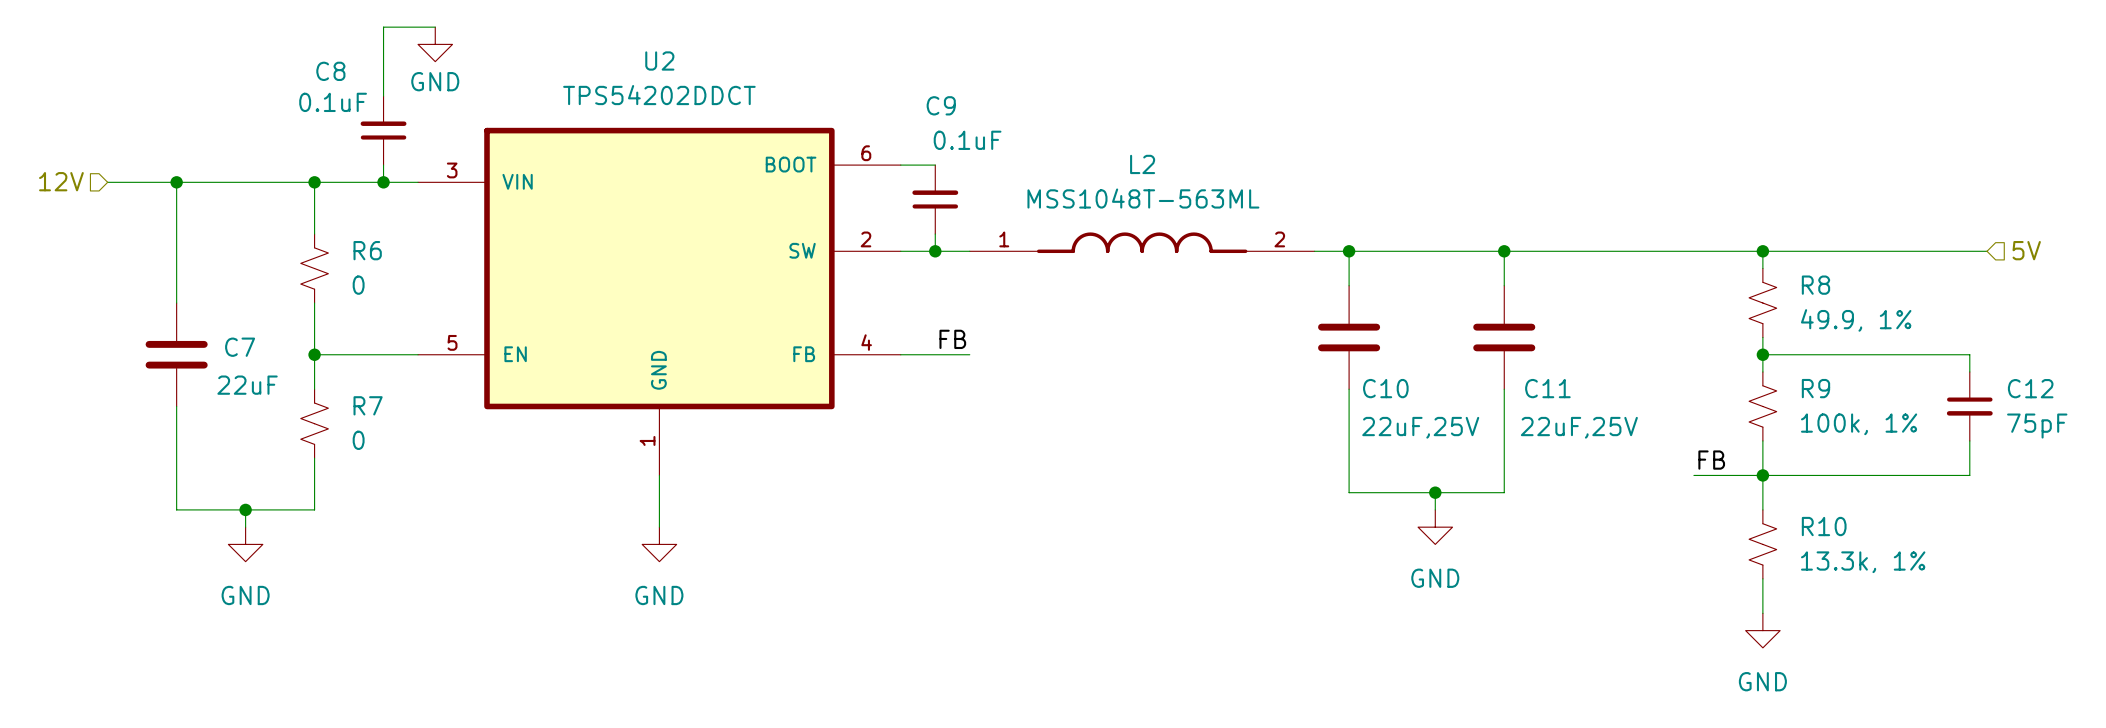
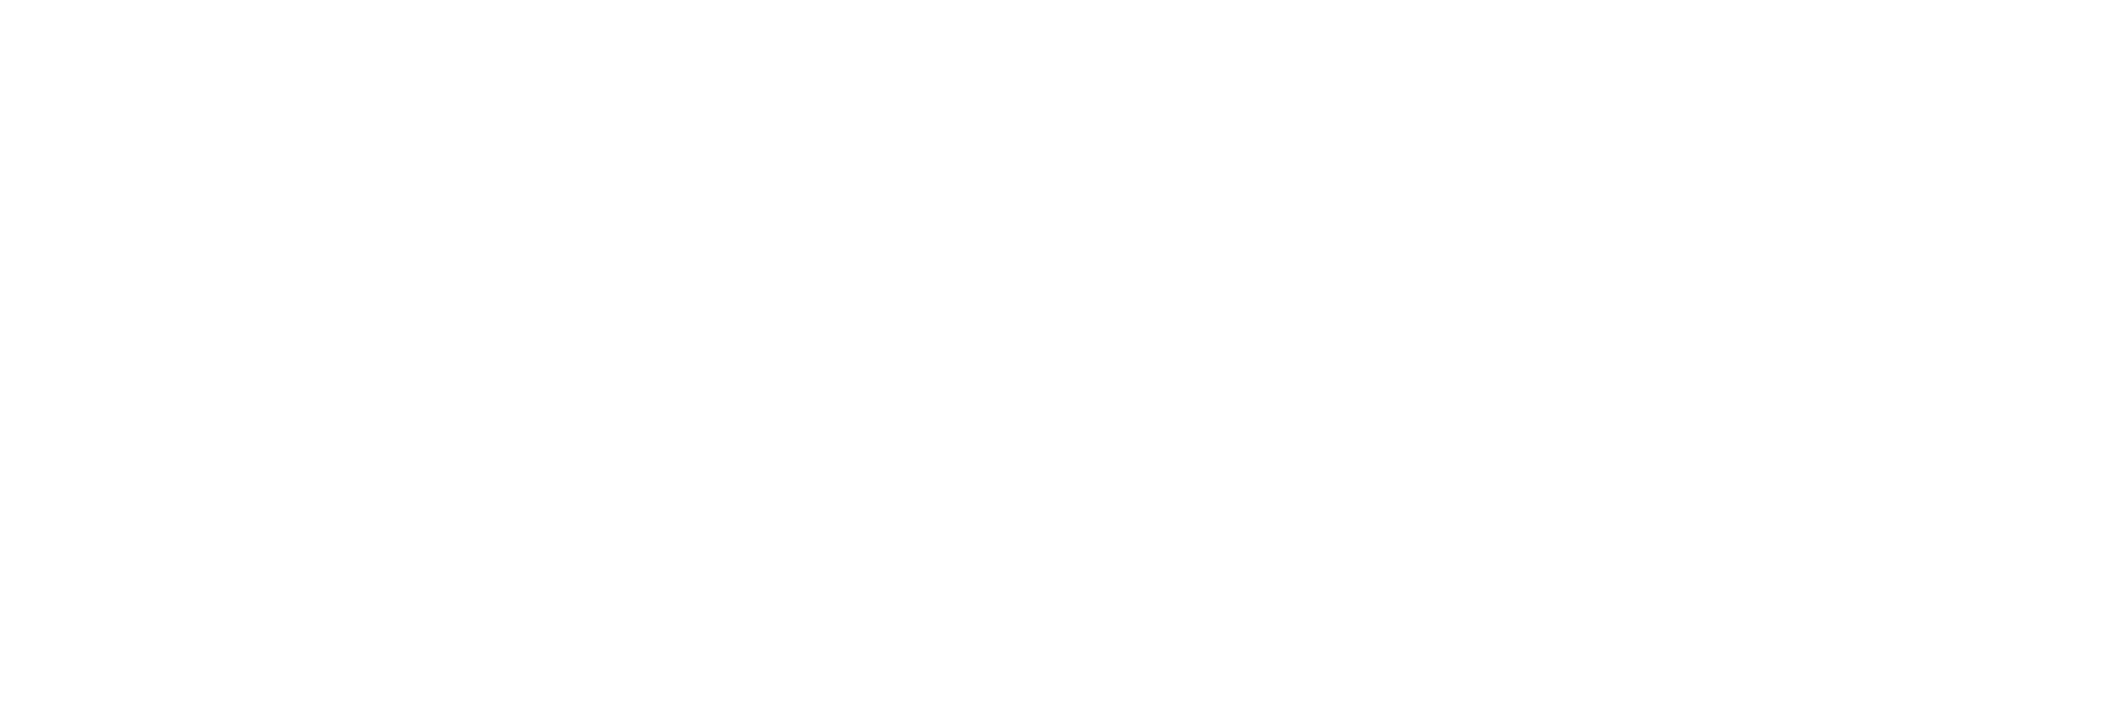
wire: (435, 27) (383, 27) (383, 96) -> none
power symbol: GND (435, 44) -> none
C8: 0.1uF (383, 130) -> none
wire: (383, 165) (383, 182) -> none
wire: (900, 165) (935, 165) -> none
hierarchical label: 12V (61, 181) -> none
wire: (107, 182) (418, 182) -> none
wire: (176, 182) (176, 303) -> none
junction: (176, 182) -> none
wire: (314, 182) (314, 234) -> none
junction: (314, 182) -> none
junction: (383, 182) -> none
C9: 0.1uF (935, 199) -> none
wire: (935, 234) (935, 251) -> none
L2: MSS1048T-563ML (1142, 242) -> none
hierarchical label: 5V (2026, 250) -> none
wire: (900, 251) (969, 251) -> none
junction: (935, 251) -> none
wire: (1314, 251) (1987, 251) -> none
wire: (1349, 251) (1349, 285) -> none
junction: (1349, 251) -> none
wire: (1504, 251) (1504, 285) -> none
junction: (1504, 251) -> none
wire: (1762, 251) (1762, 268) -> none
junction: (1762, 251) -> none
R6: 0 (314, 268) -> none
U2: TPS54202DDCT (659, 301) -> none
wire: (314, 303) (314, 389) -> none
R8: 49.9, 1% (1762, 303) -> none
C10: 22uF,25V (1349, 337) -> none
C11: 22uF,25V (1504, 337) -> none
wire: (1762, 337) (1762, 371) -> none
label: FB (952, 339) -> none
C7: 22uF (176, 354) -> none
wire: (314, 354) (418, 354) -> none
junction: (314, 354) -> none
wire: (900, 354) (969, 354) -> none
wire: (1762, 354) (1969, 354) (1969, 371) -> none
junction: (1762, 354) -> none
wire: (1349, 389) (1349, 492) (1504, 492) (1504, 389) -> none
wire: (176, 406) (176, 509) (314, 509) (314, 458) -> none
R9: 100k, 1% (1762, 406) -> none
C12: 75pF (1969, 406) -> none
R7: 0 (314, 423) -> none
wire: (1762, 440) (1762, 509) -> none
wire: (1969, 440) (1969, 475) (1693, 475) -> none
label: FB (1711, 460) -> none
wire: (659, 475) (659, 527) -> none
junction: (1762, 475) -> none
wire: (1435, 492) (1435, 509) -> none
junction: (1435, 492) -> none
wire: (245, 509) (245, 527) -> none
junction: (245, 509) -> none
power symbol: GND (1435, 527) -> none
power symbol: GND (245, 544) -> none
power symbol: GND (659, 544) -> none
R10: 13.3k, 1% (1762, 544) -> none
wire: (1762, 578) (1762, 613) -> none
power symbol: GND (1762, 630) -> none

